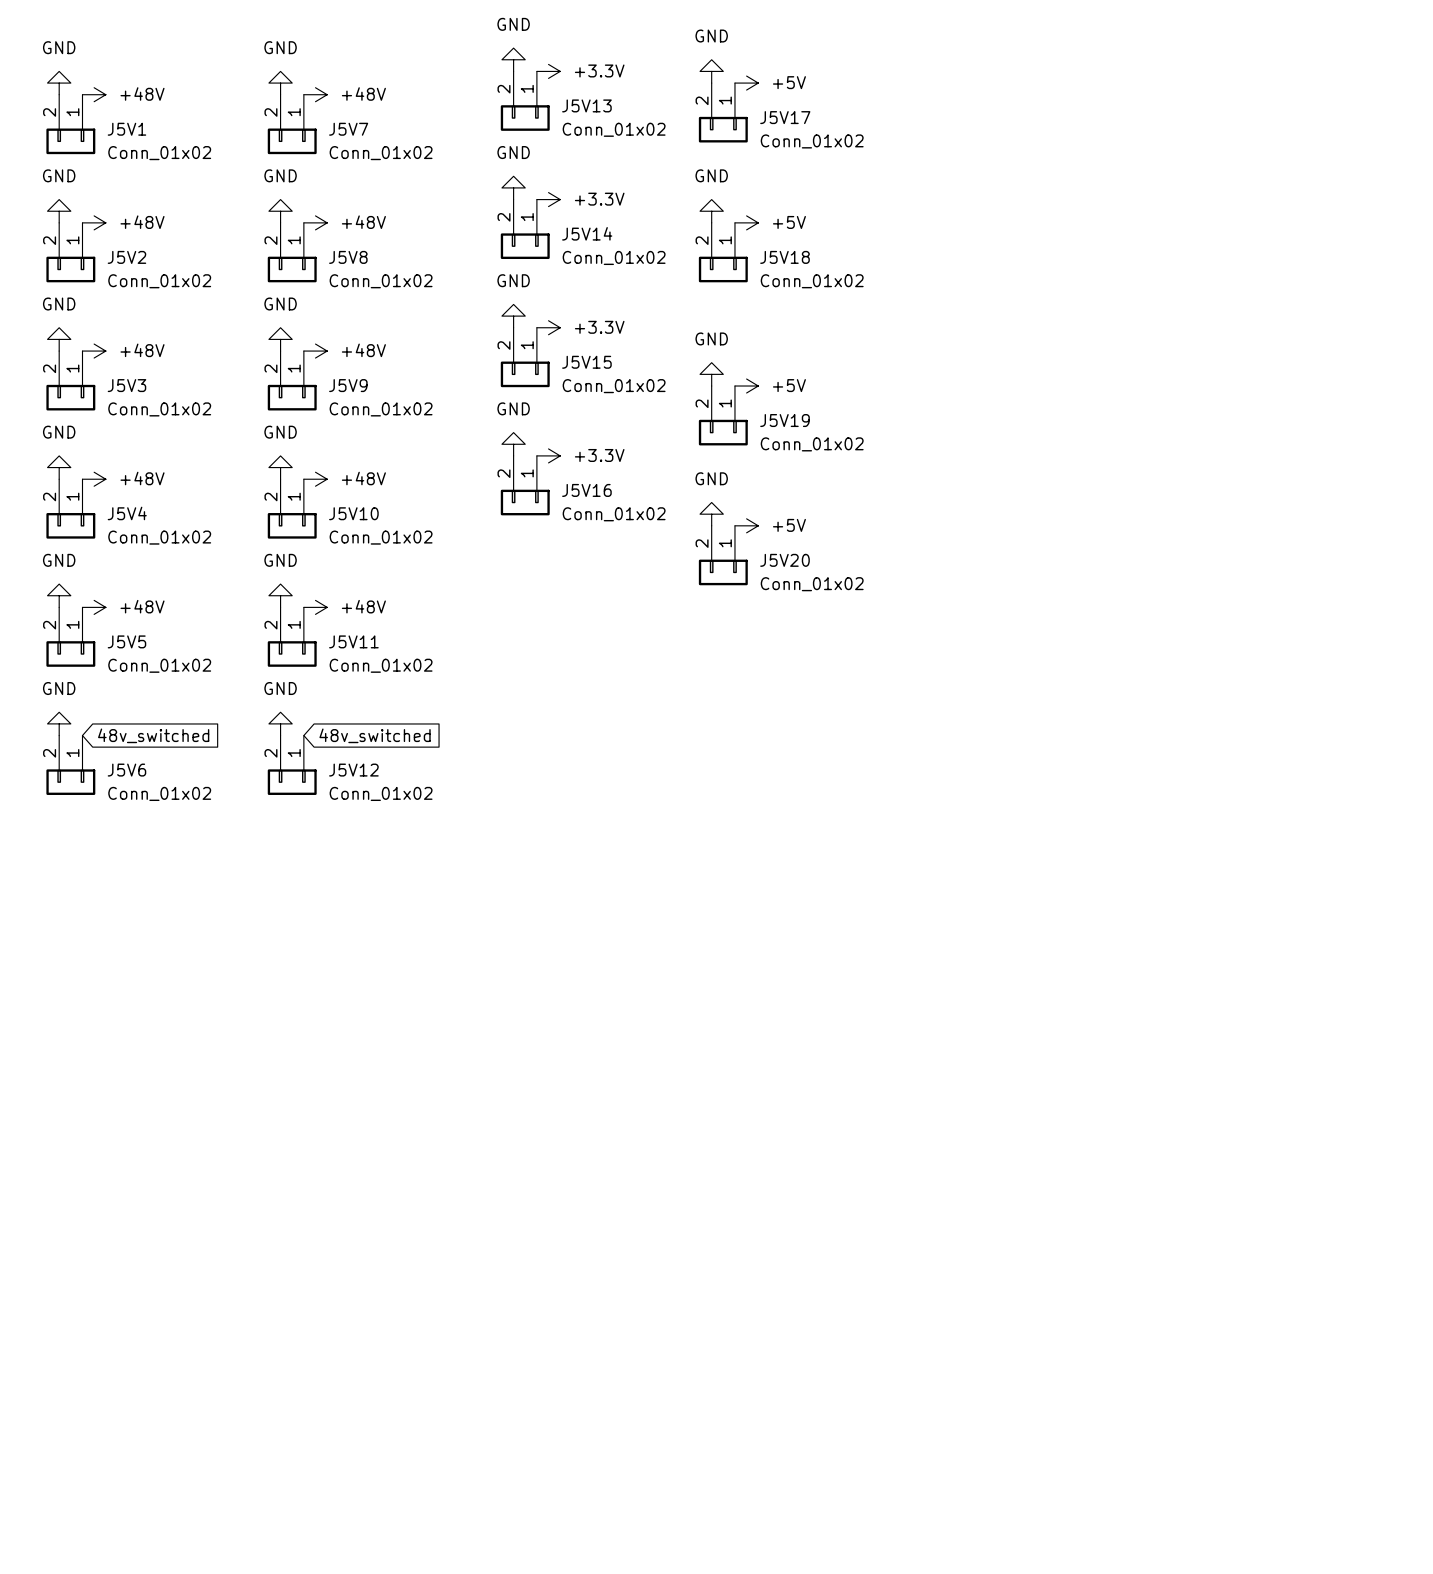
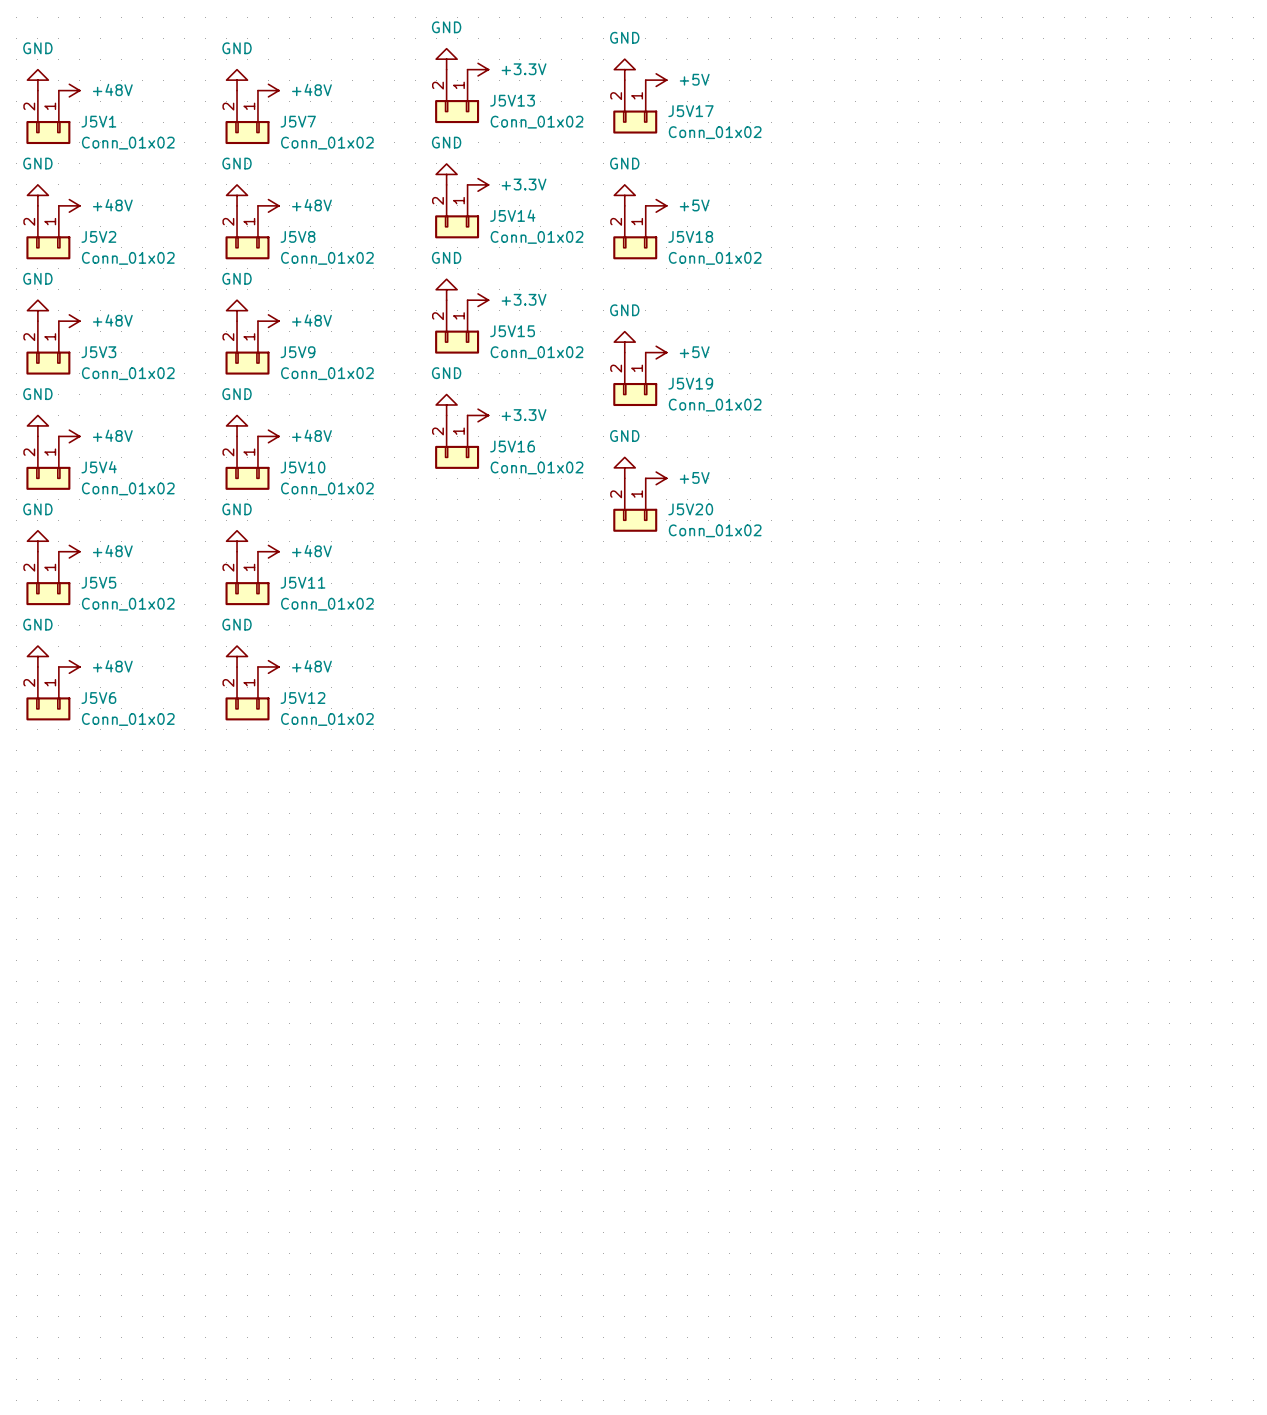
power symbol: none -> +48V (69, 666)
global label: 48v_switched (153, 735) -> none
power symbol: none -> +48V (268, 666)
global label: 48v_switched (375, 735) -> none

